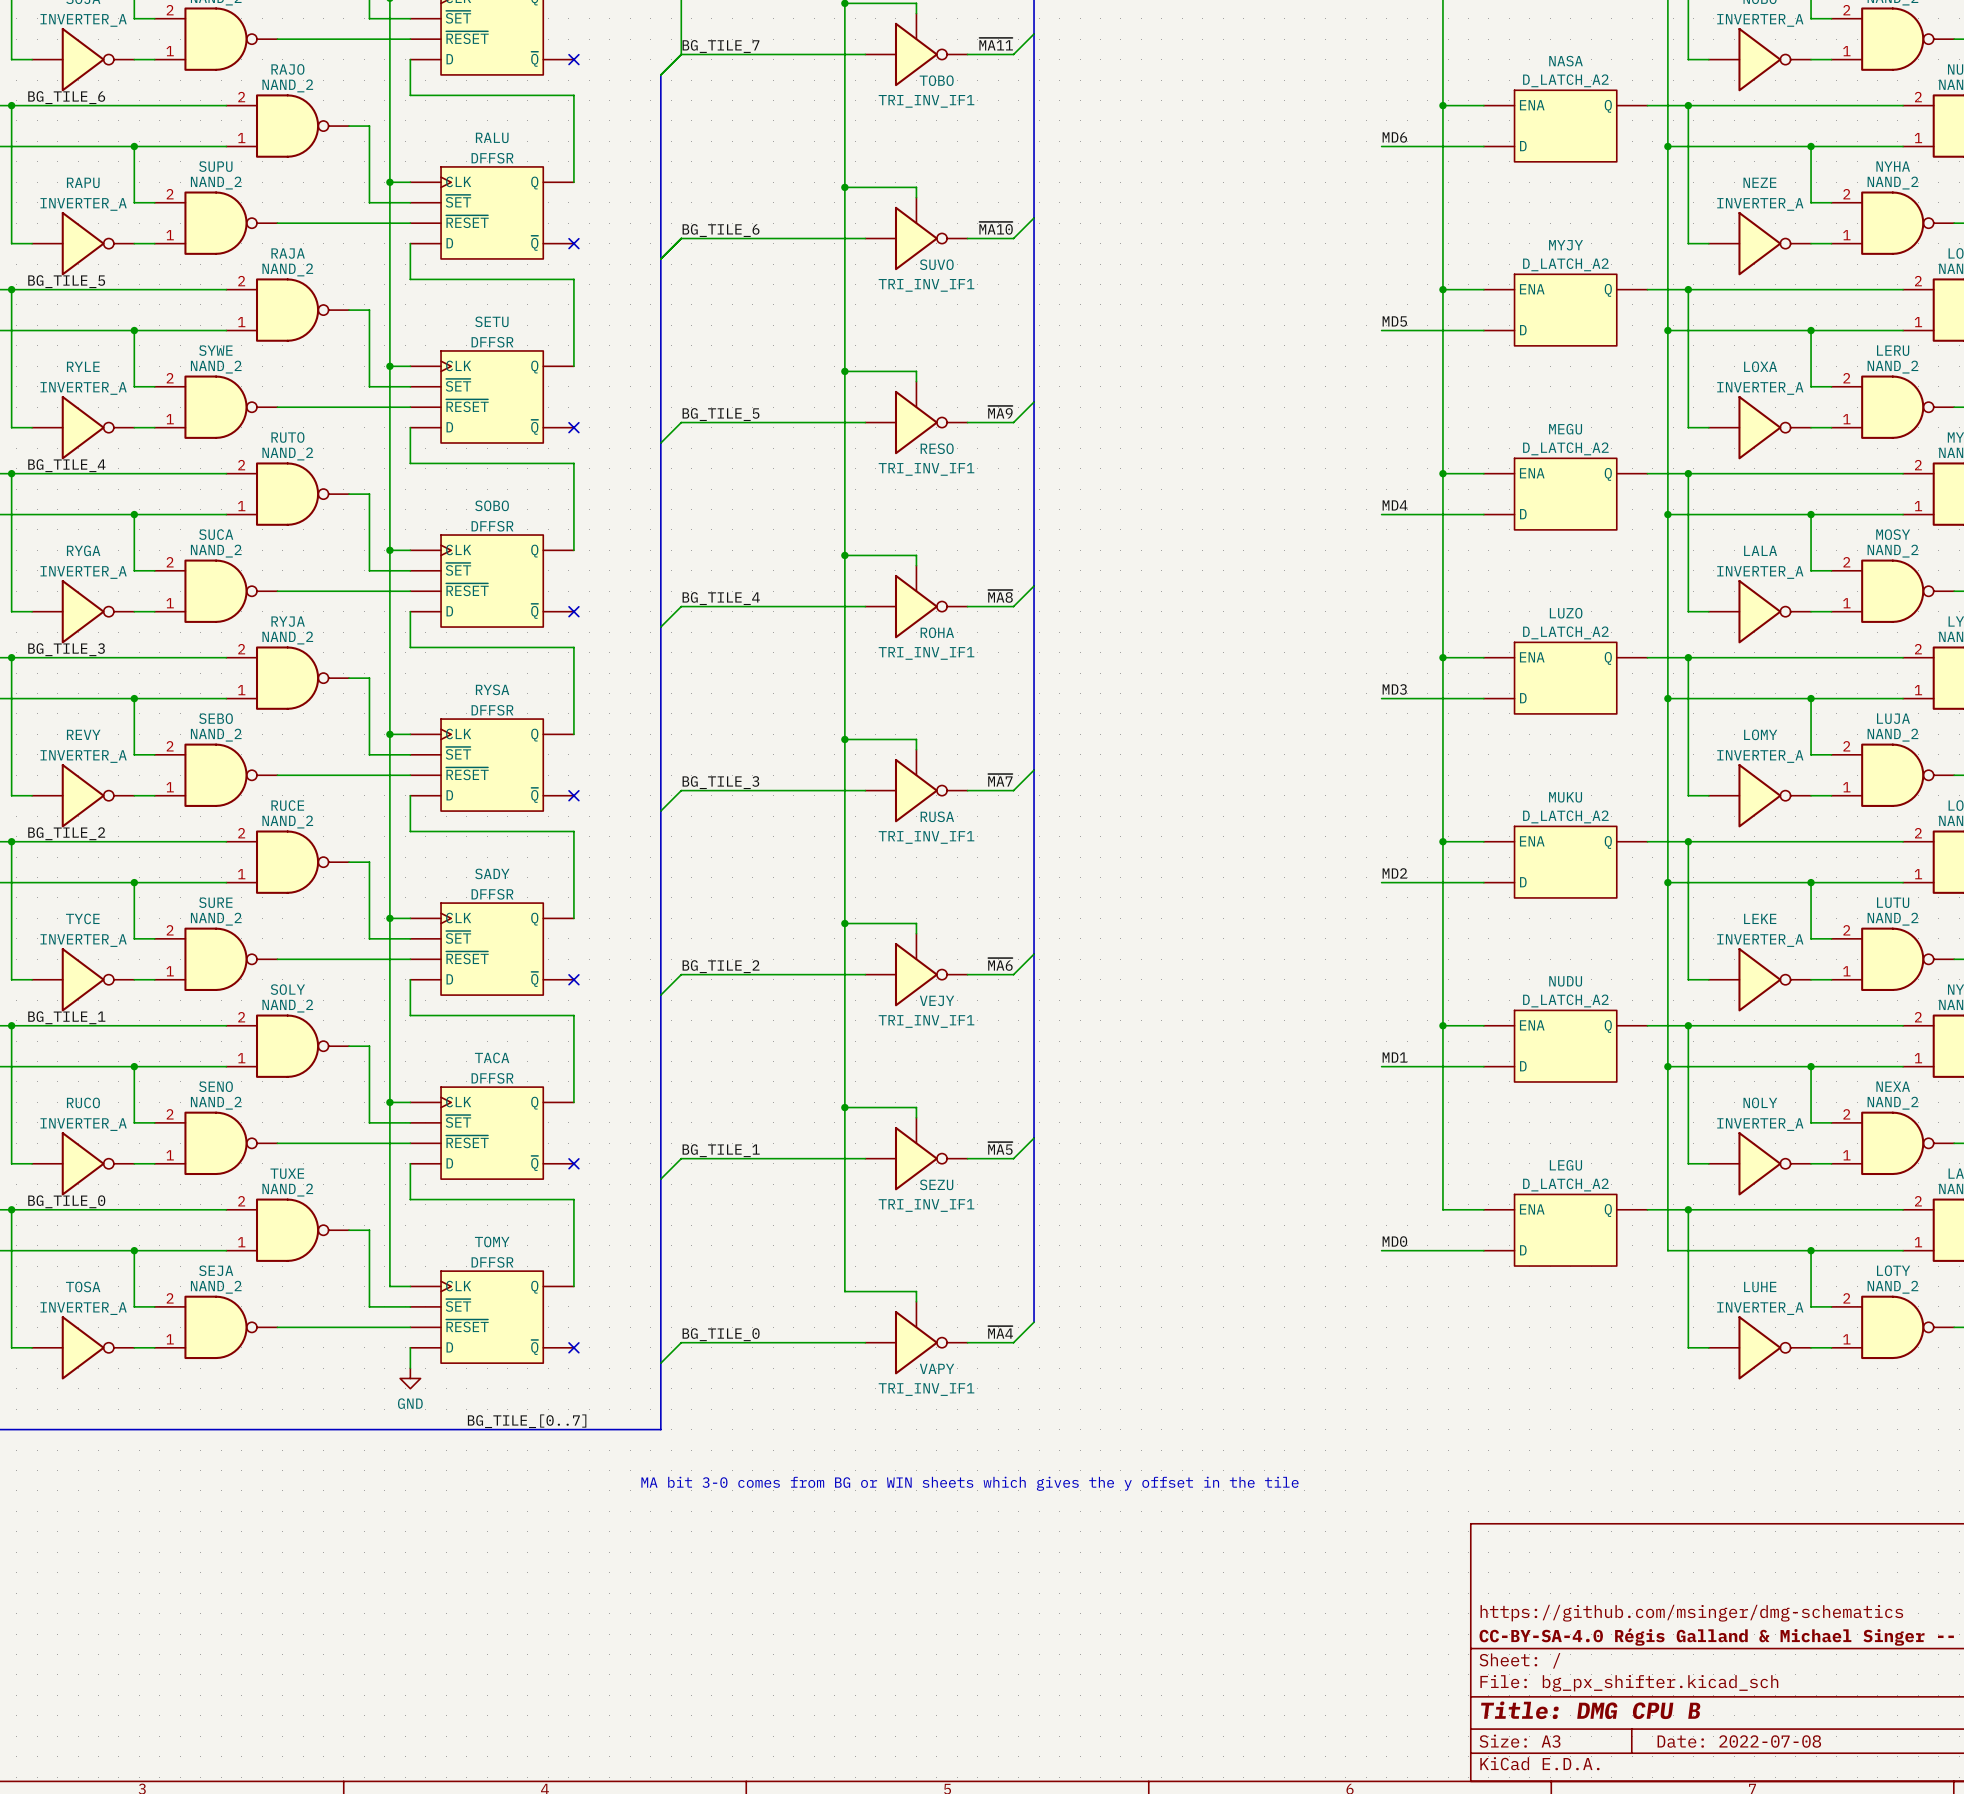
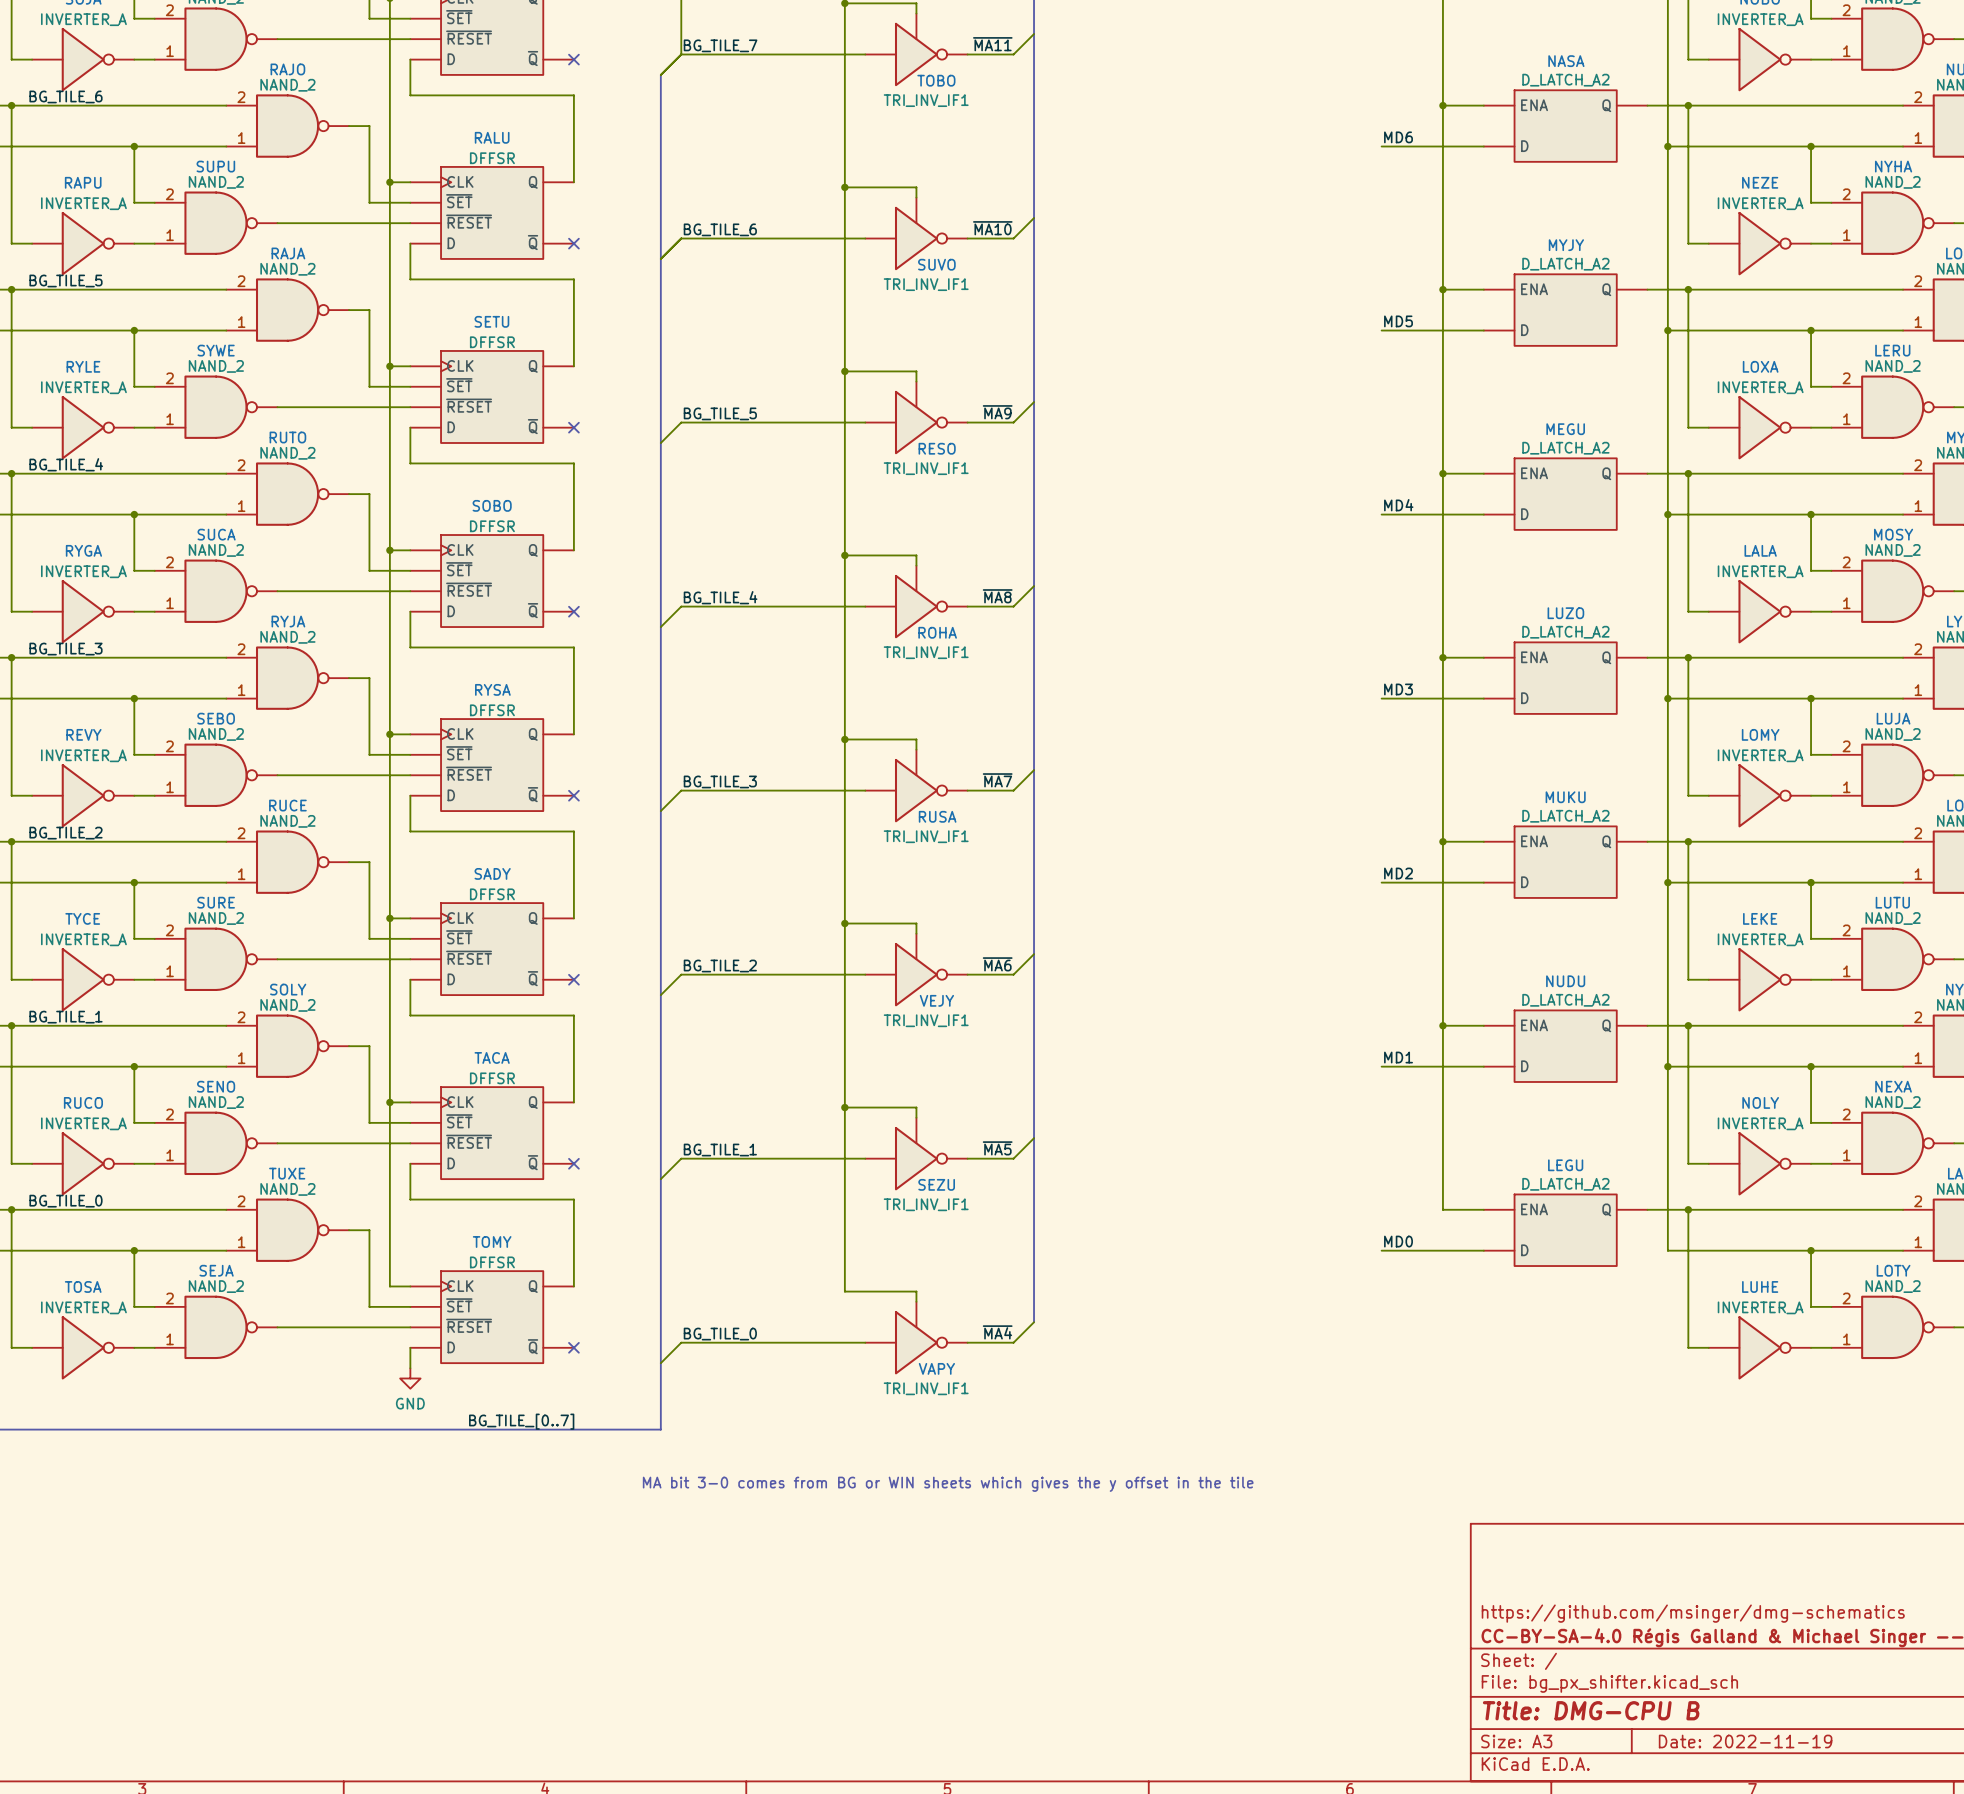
title block: Title: DMG CPU B (1590, 1710) -> Title: DMG-CPU B (1591, 1710)
title block: Date: 2022-07-08 (1739, 1741) -> Date: 2022-11-19 (1745, 1741)

